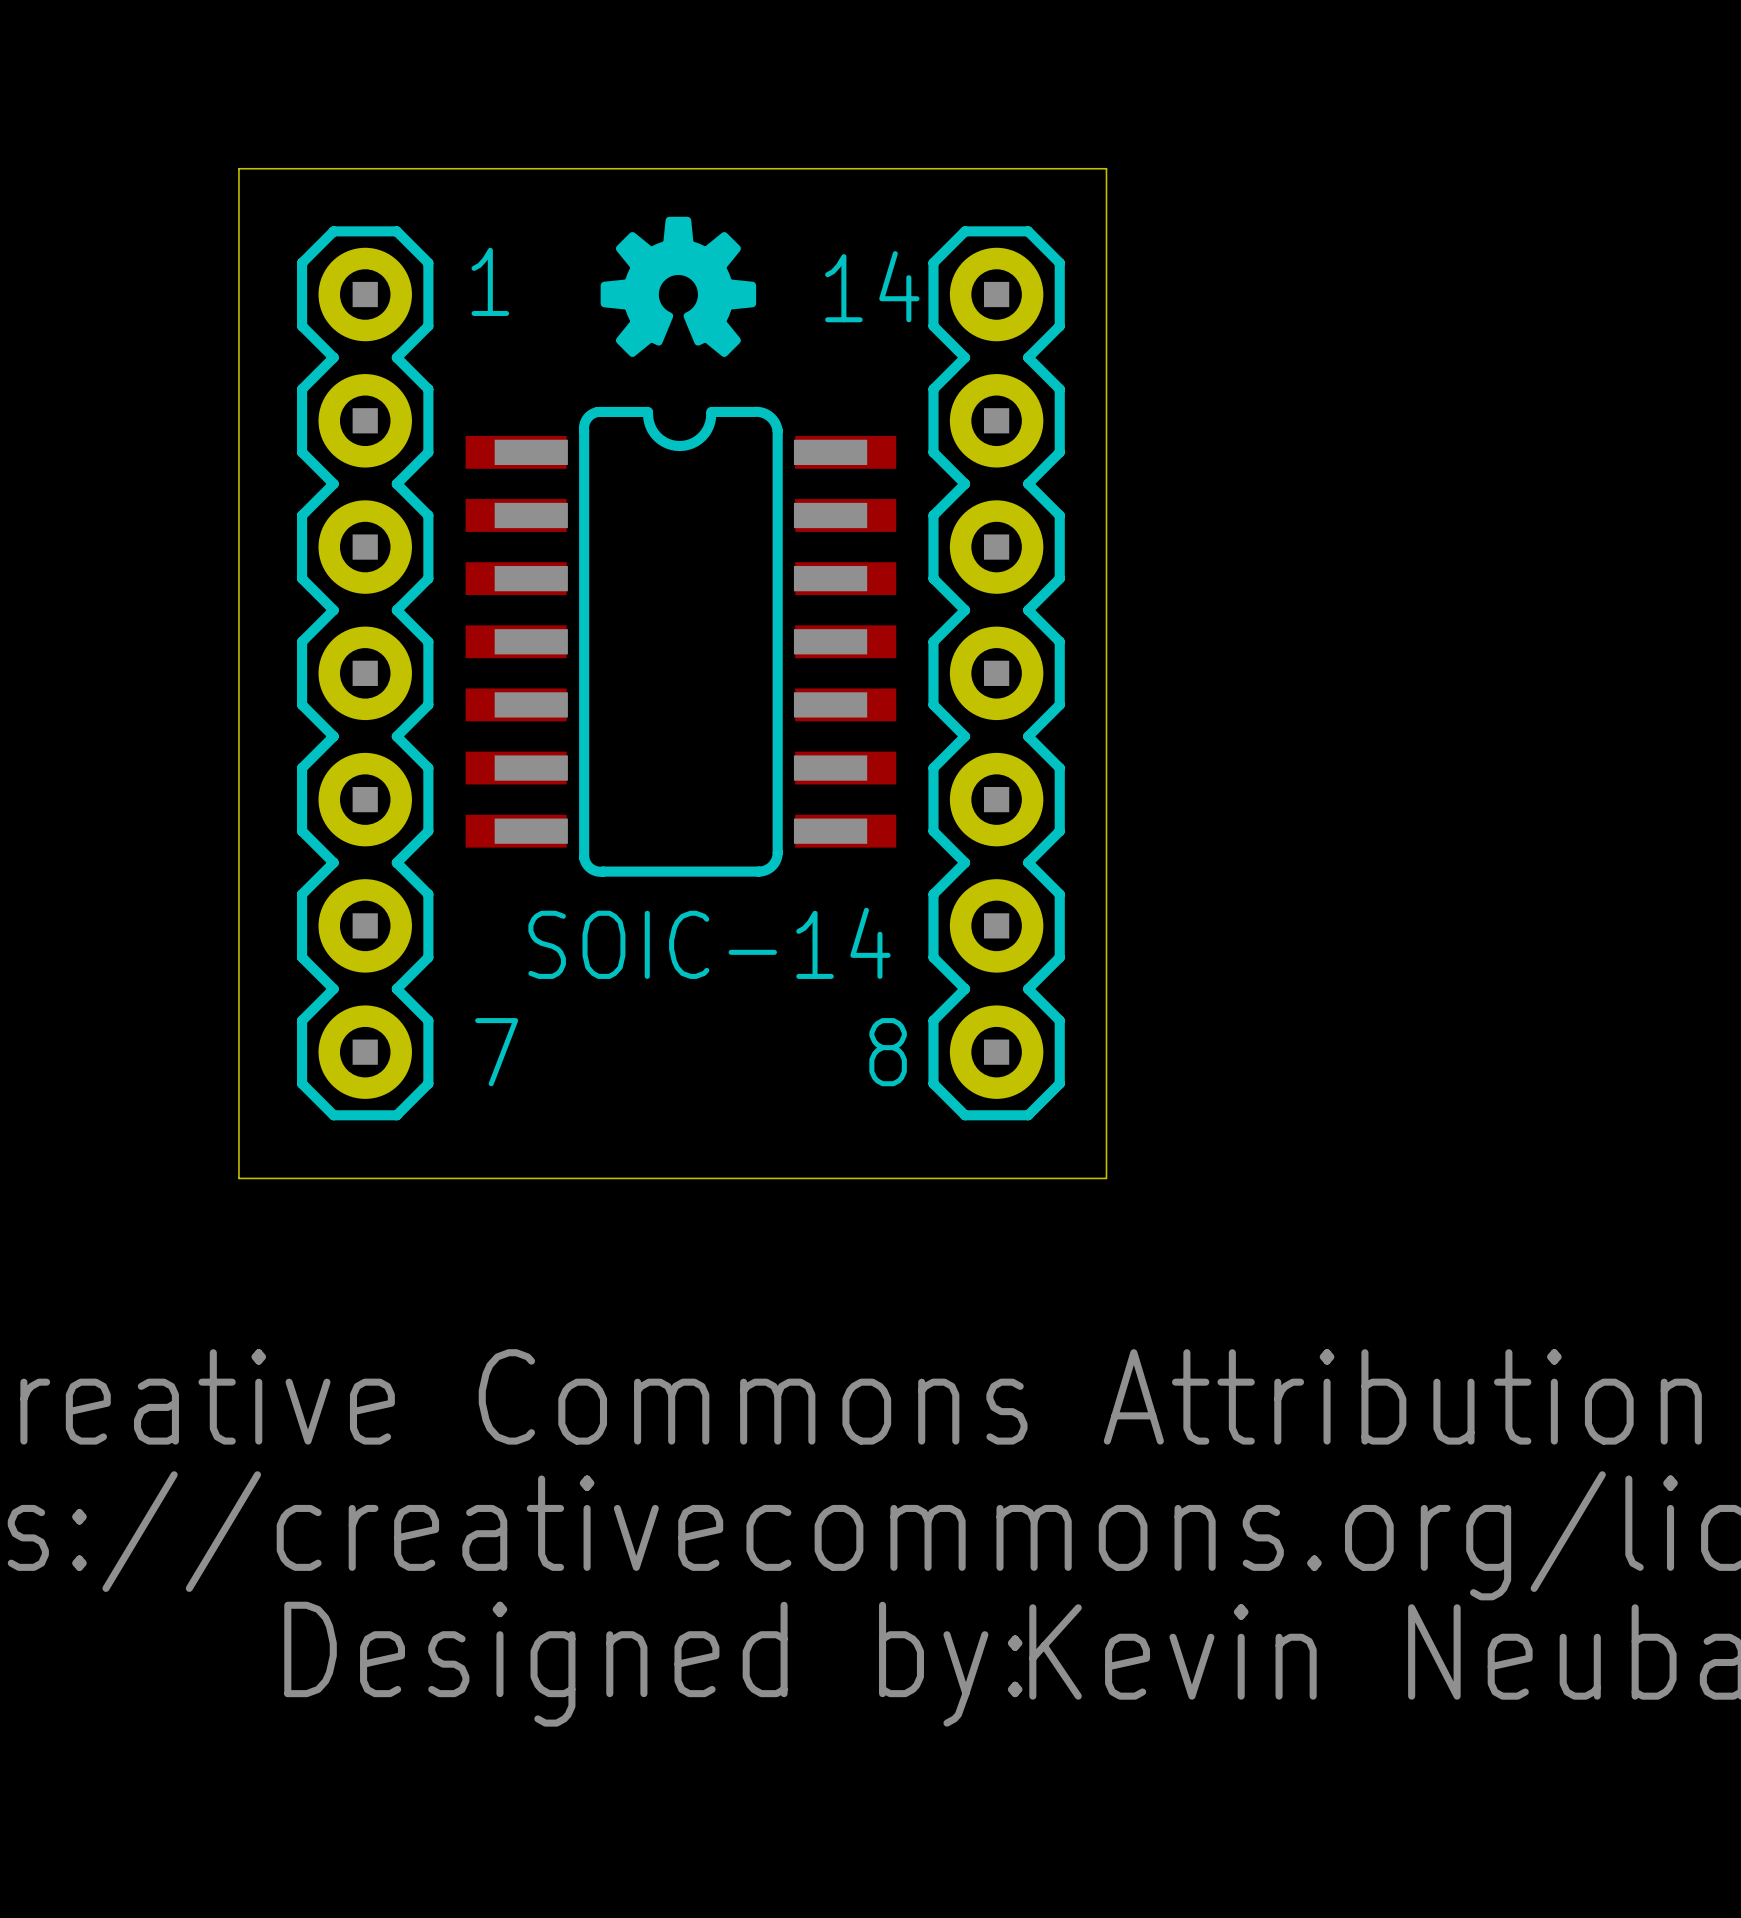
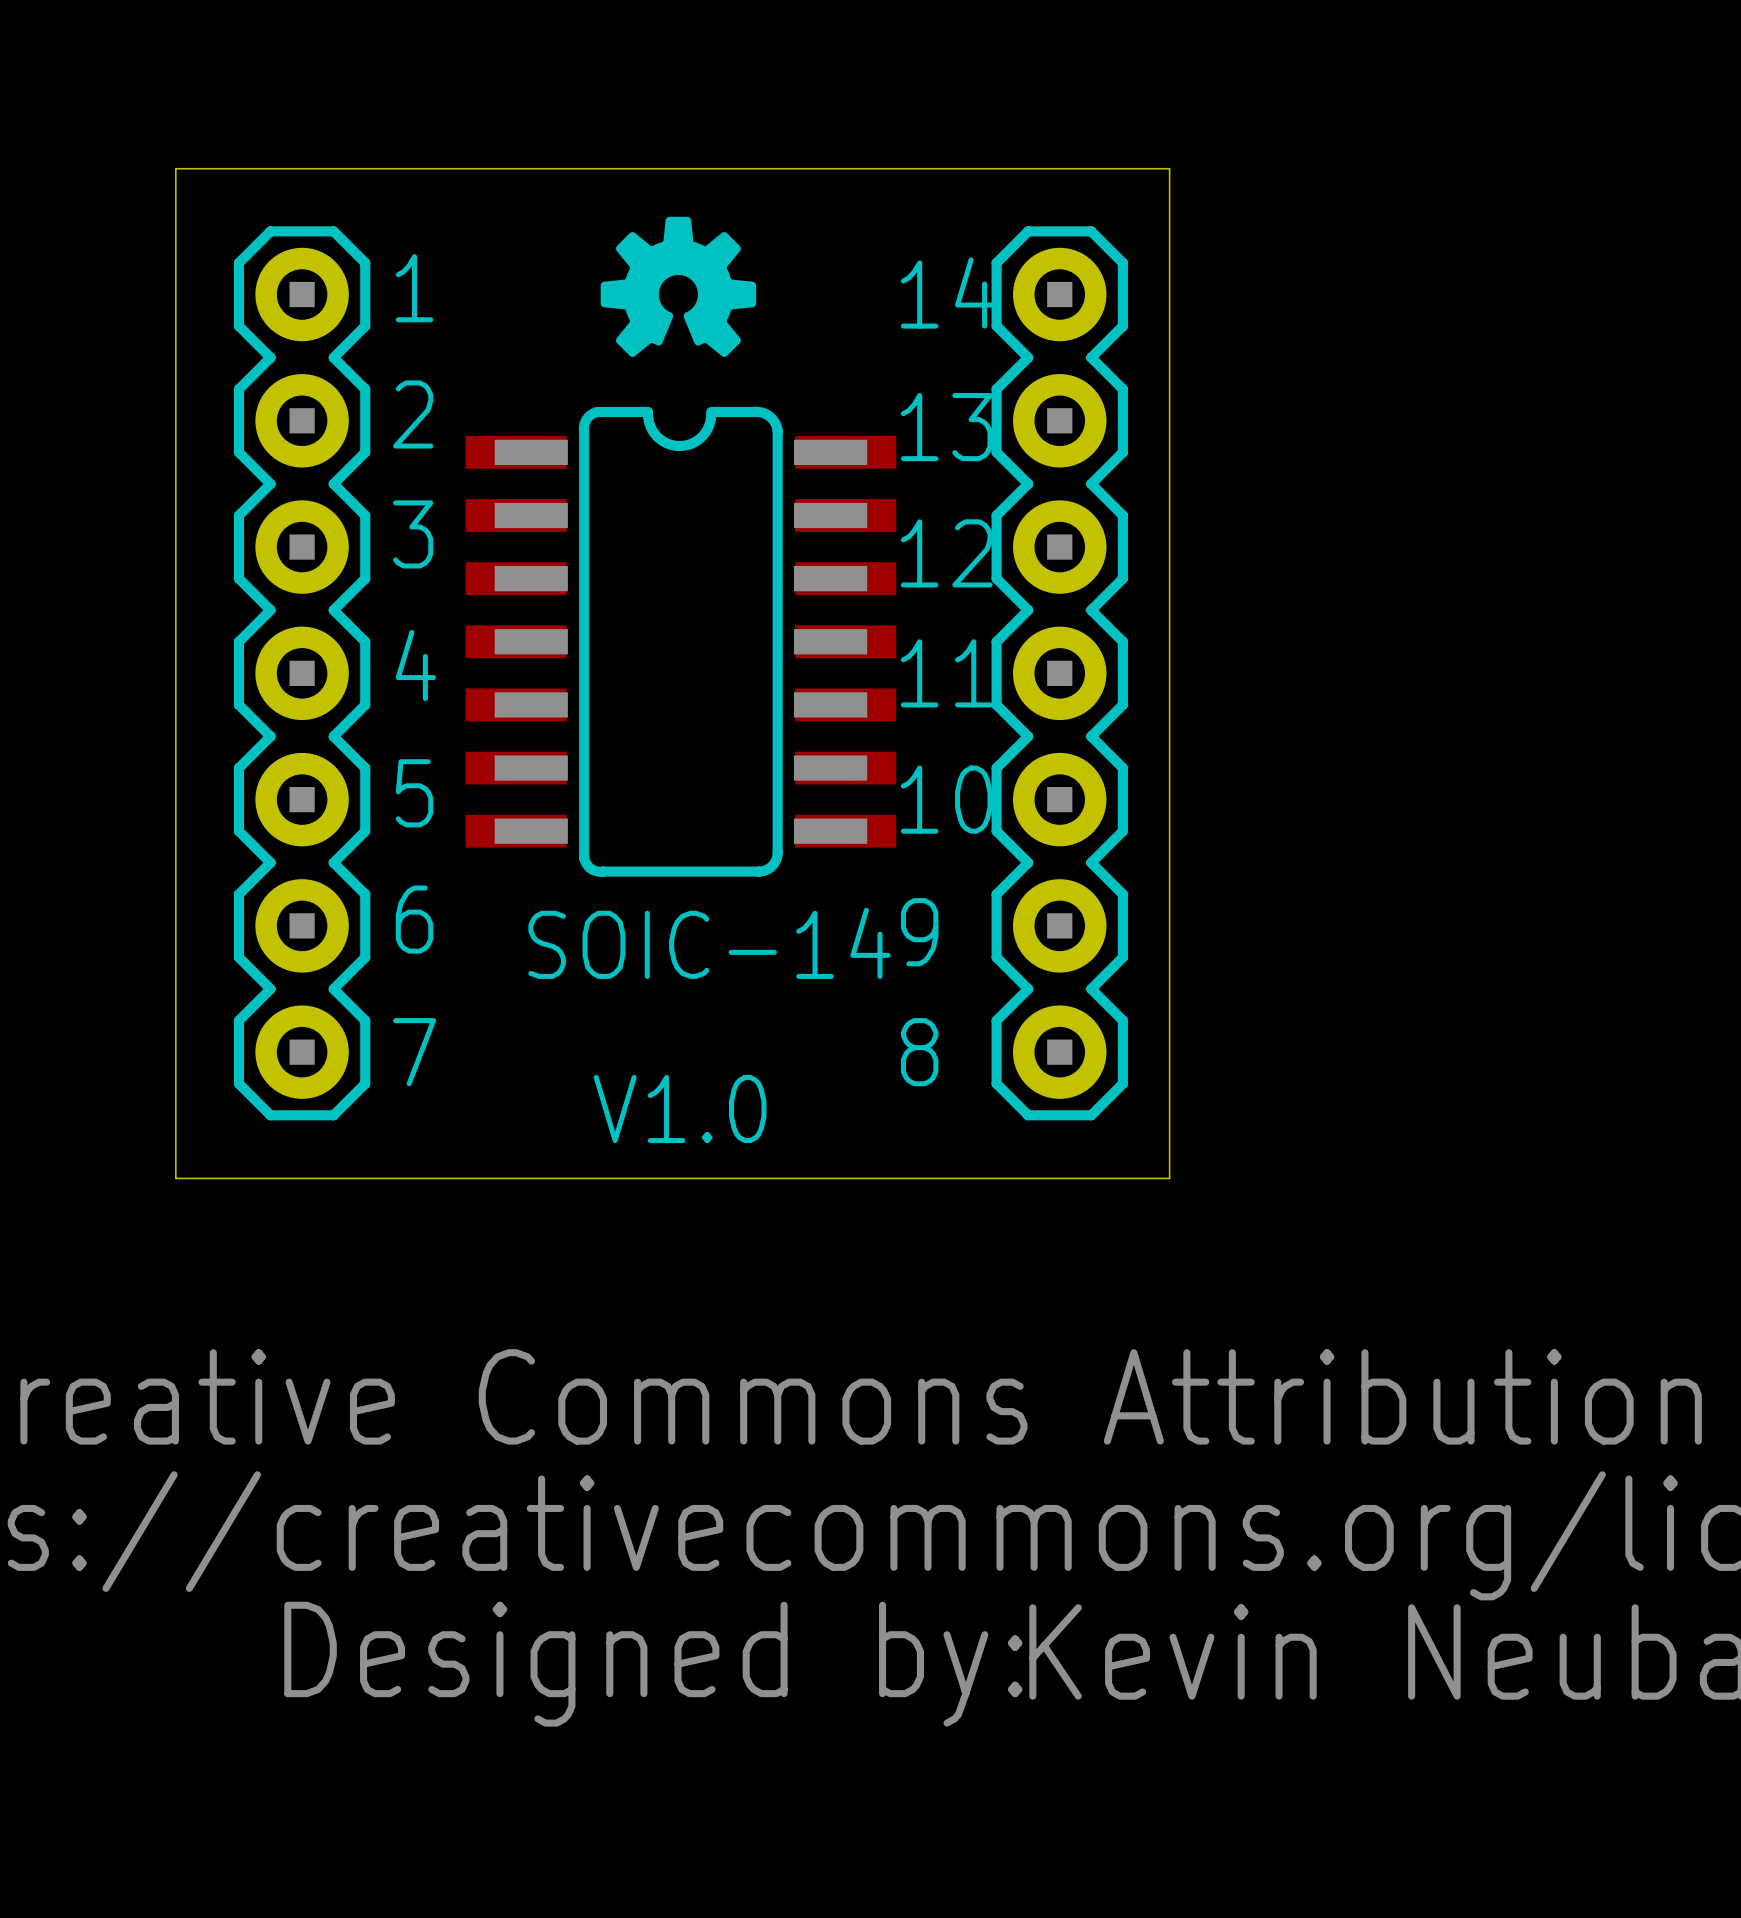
board edge: (238, 168) (238, 1178) -> (238, 168) (175, 168) (175, 1178) (238, 1178)
board edge: (1106, 168) (1106, 1178) -> (1106, 168) (1169, 168) (1169, 1178) (1106, 1178)
text position: 1 (490, 281) -> 1 (414, 288)
text position: 14 (872, 286) -> 14 (948, 293)
text: none -> 2 (413, 414)
text: none -> 13 (946, 427)
text: none -> 3 (413, 534)
text: none -> 12 (946, 553)
text: none -> 4 (415, 665)
part position: (365, 673) -> (302, 673)
text: none -> 11 (946, 673)
part position: (996, 673) -> (1059, 673)
text: none -> 5 (414, 793)
text: none -> 10 (946, 799)
text: none -> 6 (414, 919)
text: none -> 9 (919, 932)
text position: 7 (496, 1052) -> 7 (414, 1052)
text position: 8 (888, 1052) -> 8 (919, 1052)
text: none -> V1.0 (680, 1108)

